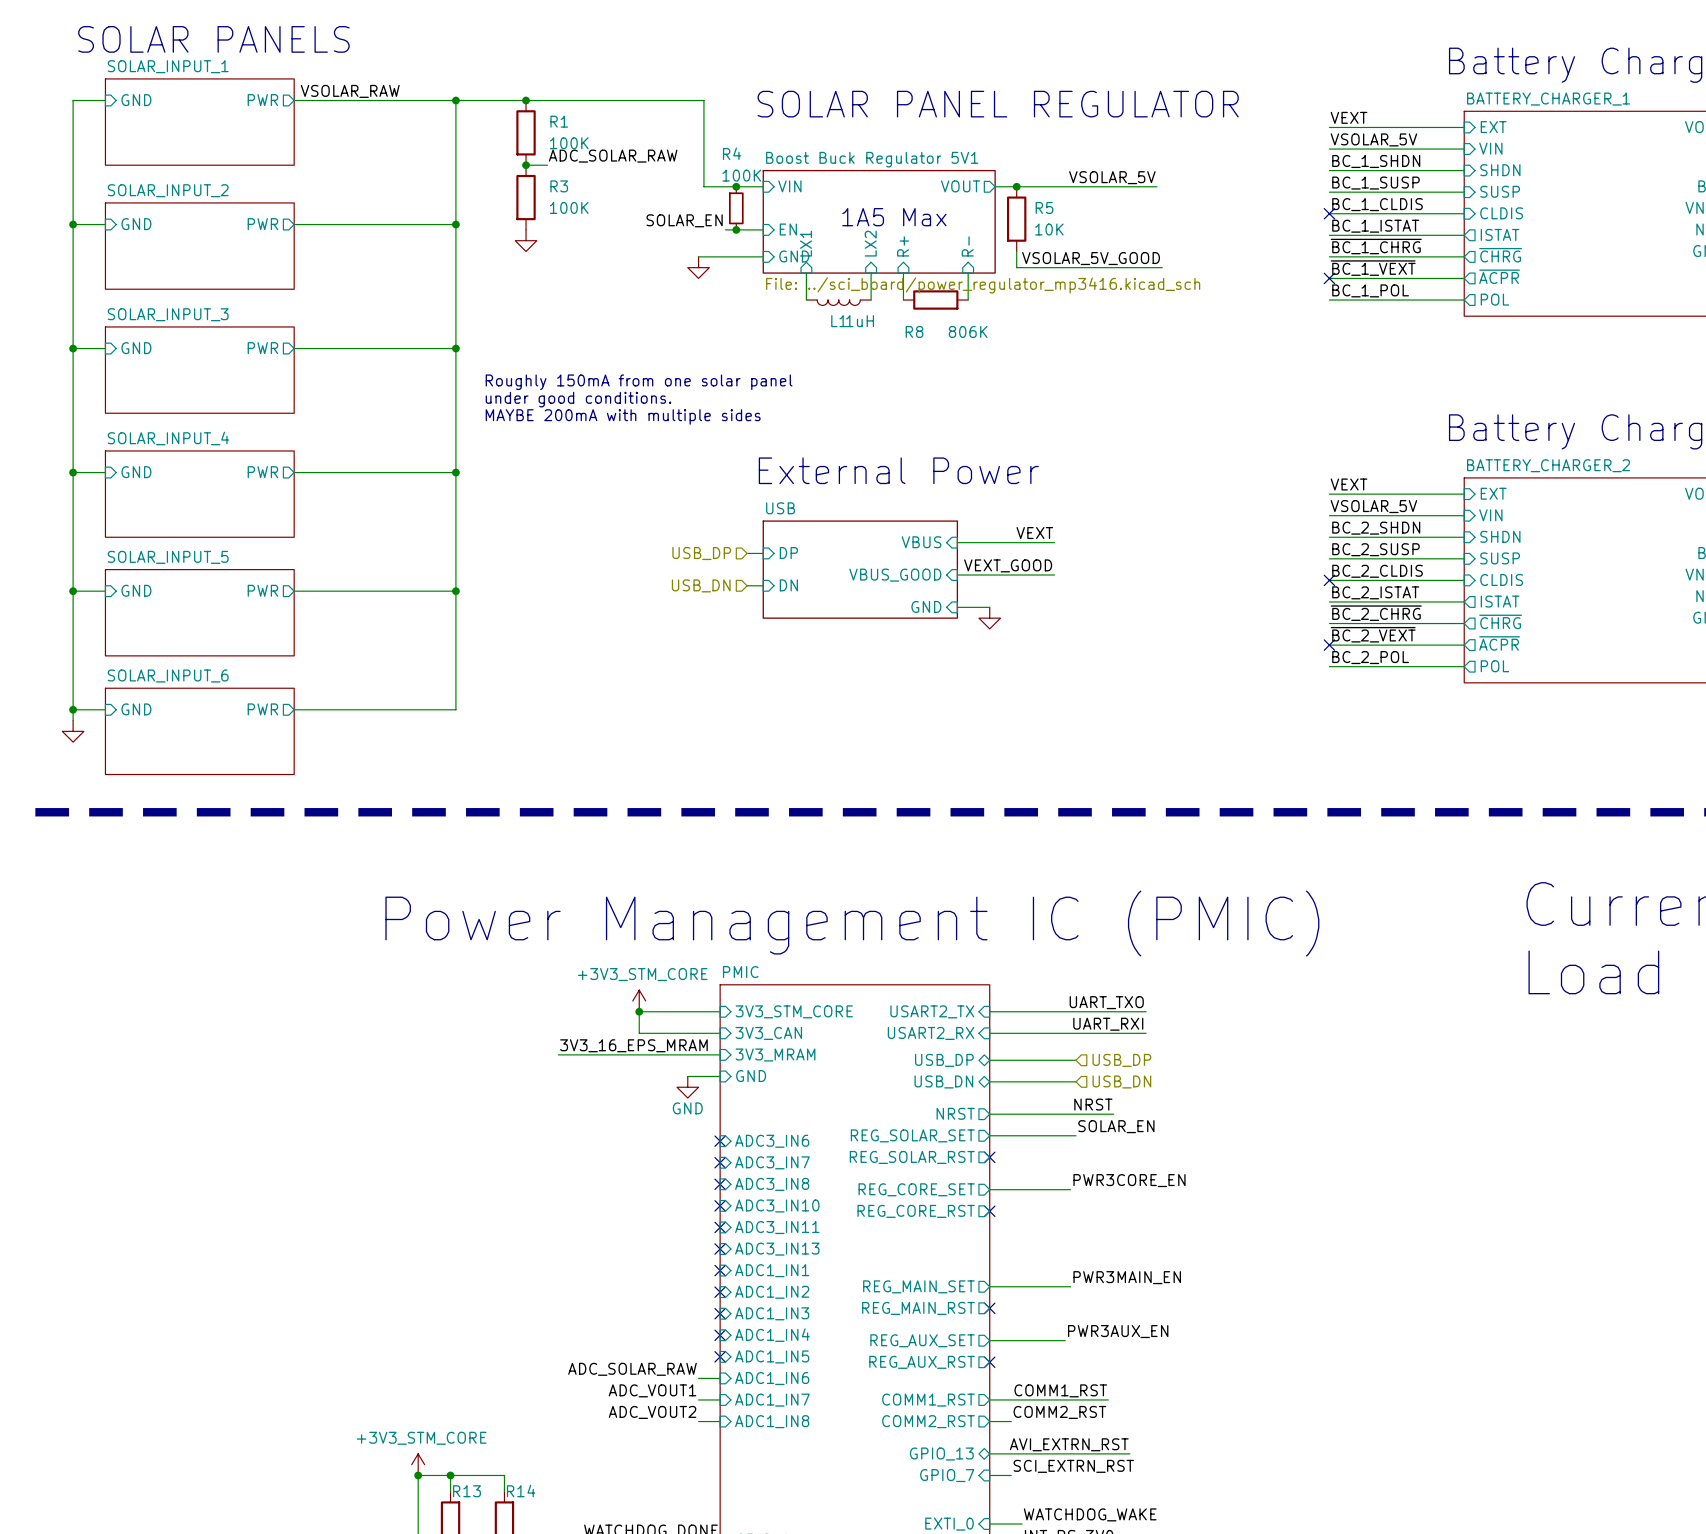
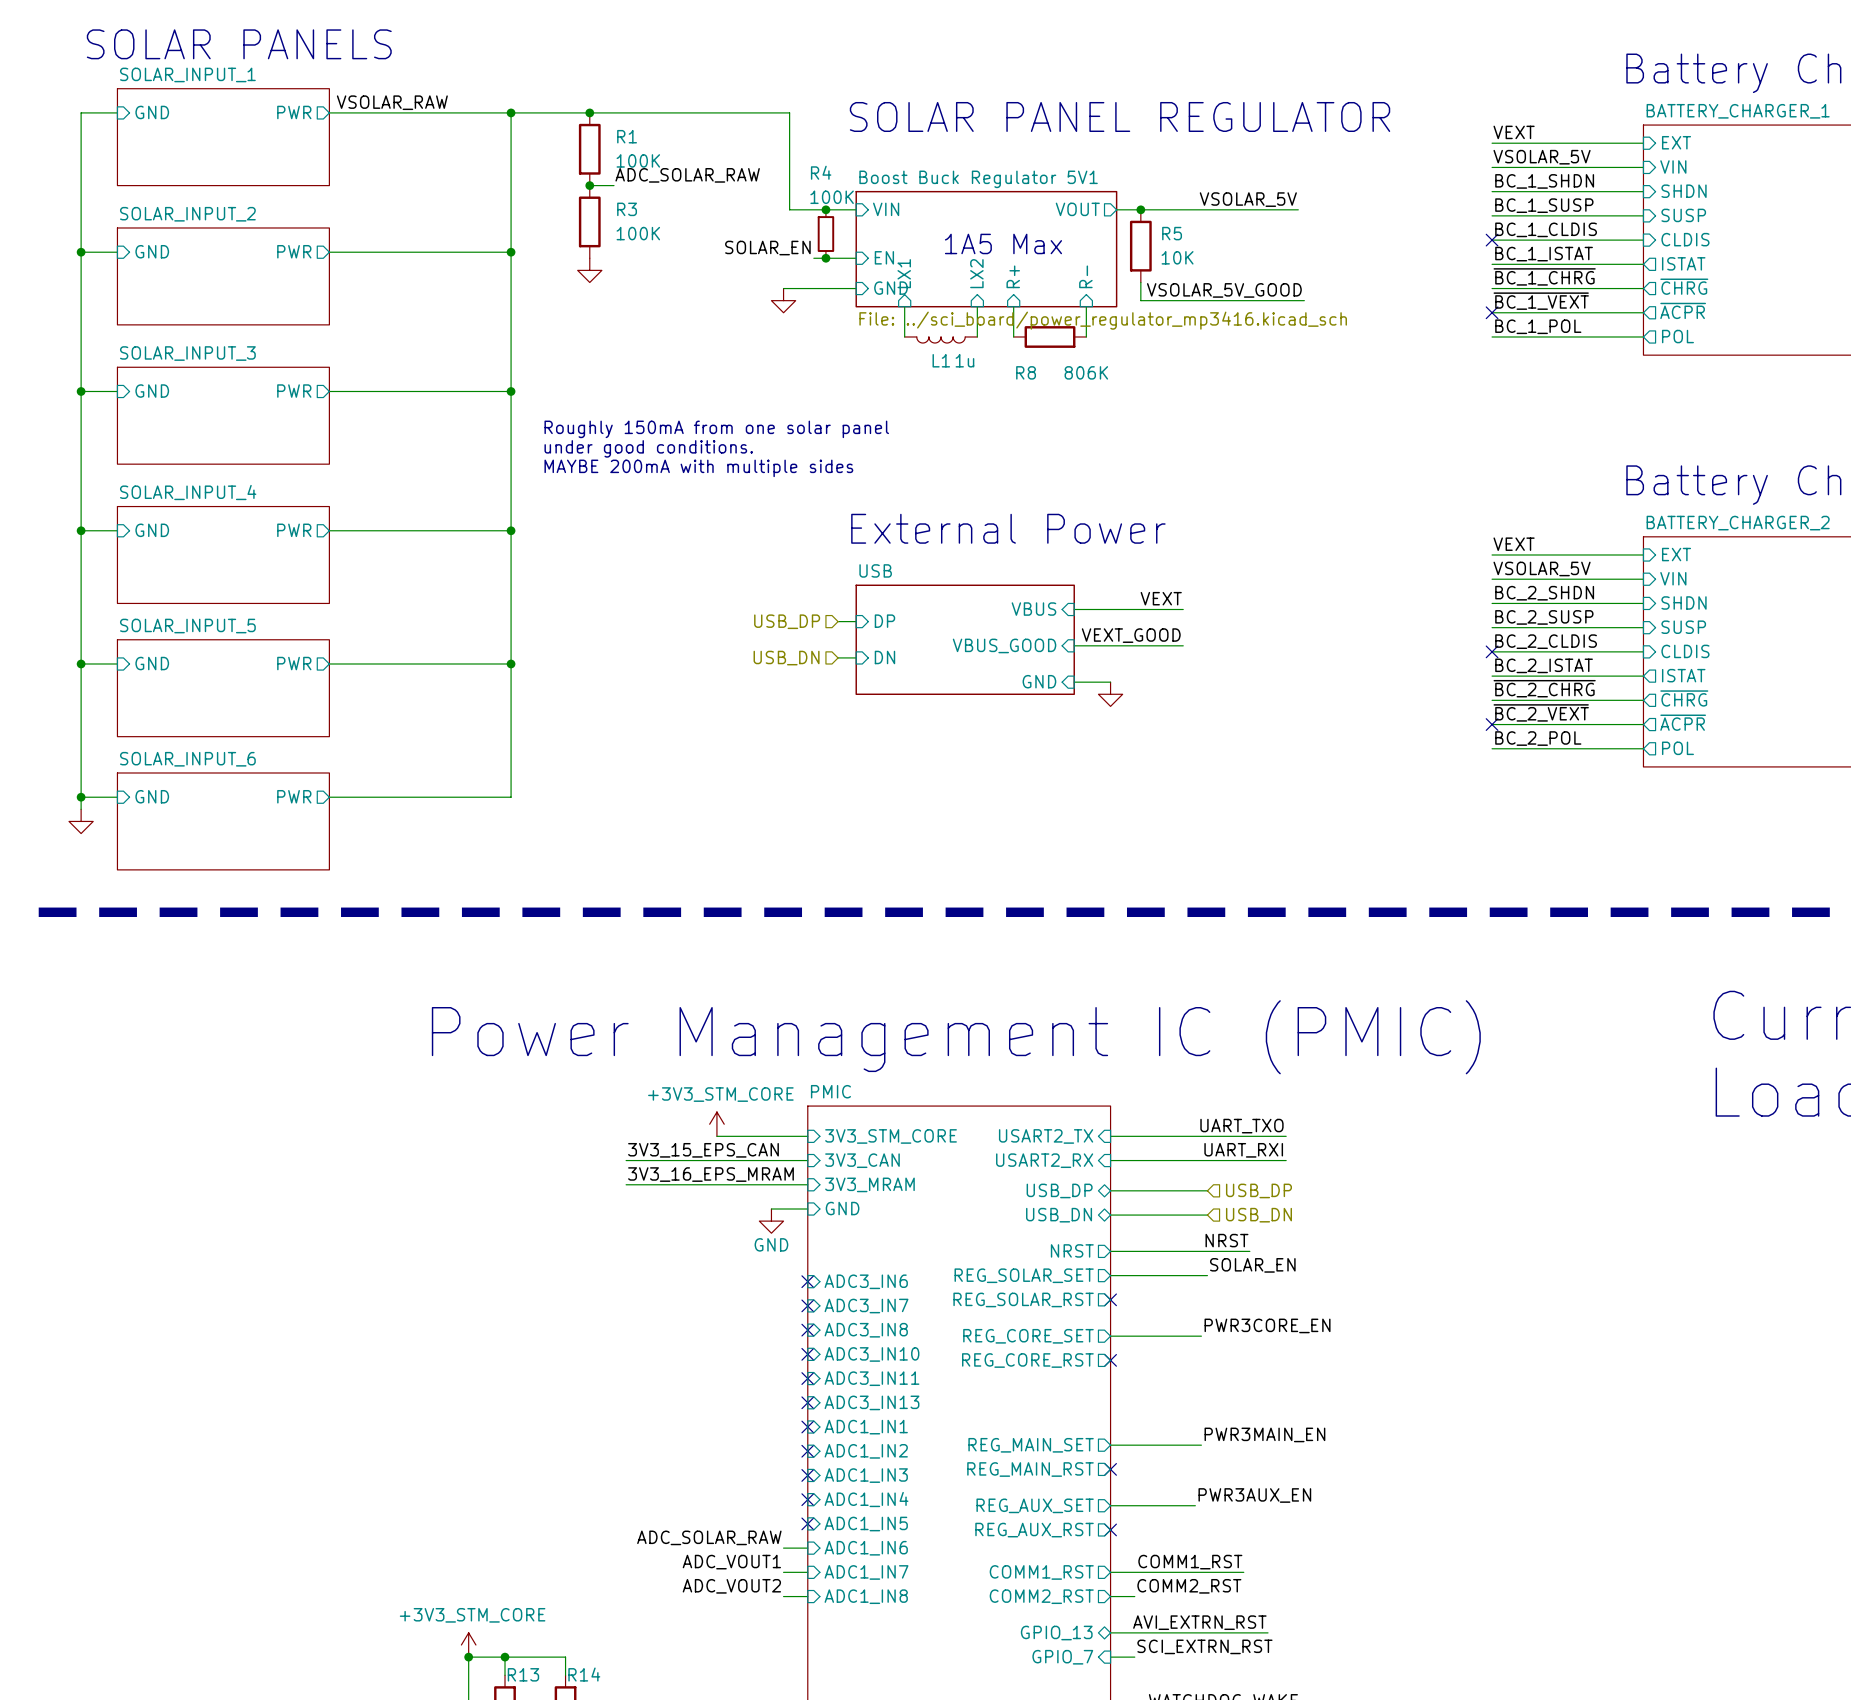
L1 value: 1uH (860, 321) -> 1u (964, 360)
wire: (639, 1011) (639, 1033) -> (626, 1160) (716, 1160)
junction: (639, 1011) -> none
label: none -> 3V3_15_EPS_CAN (703, 1150)

